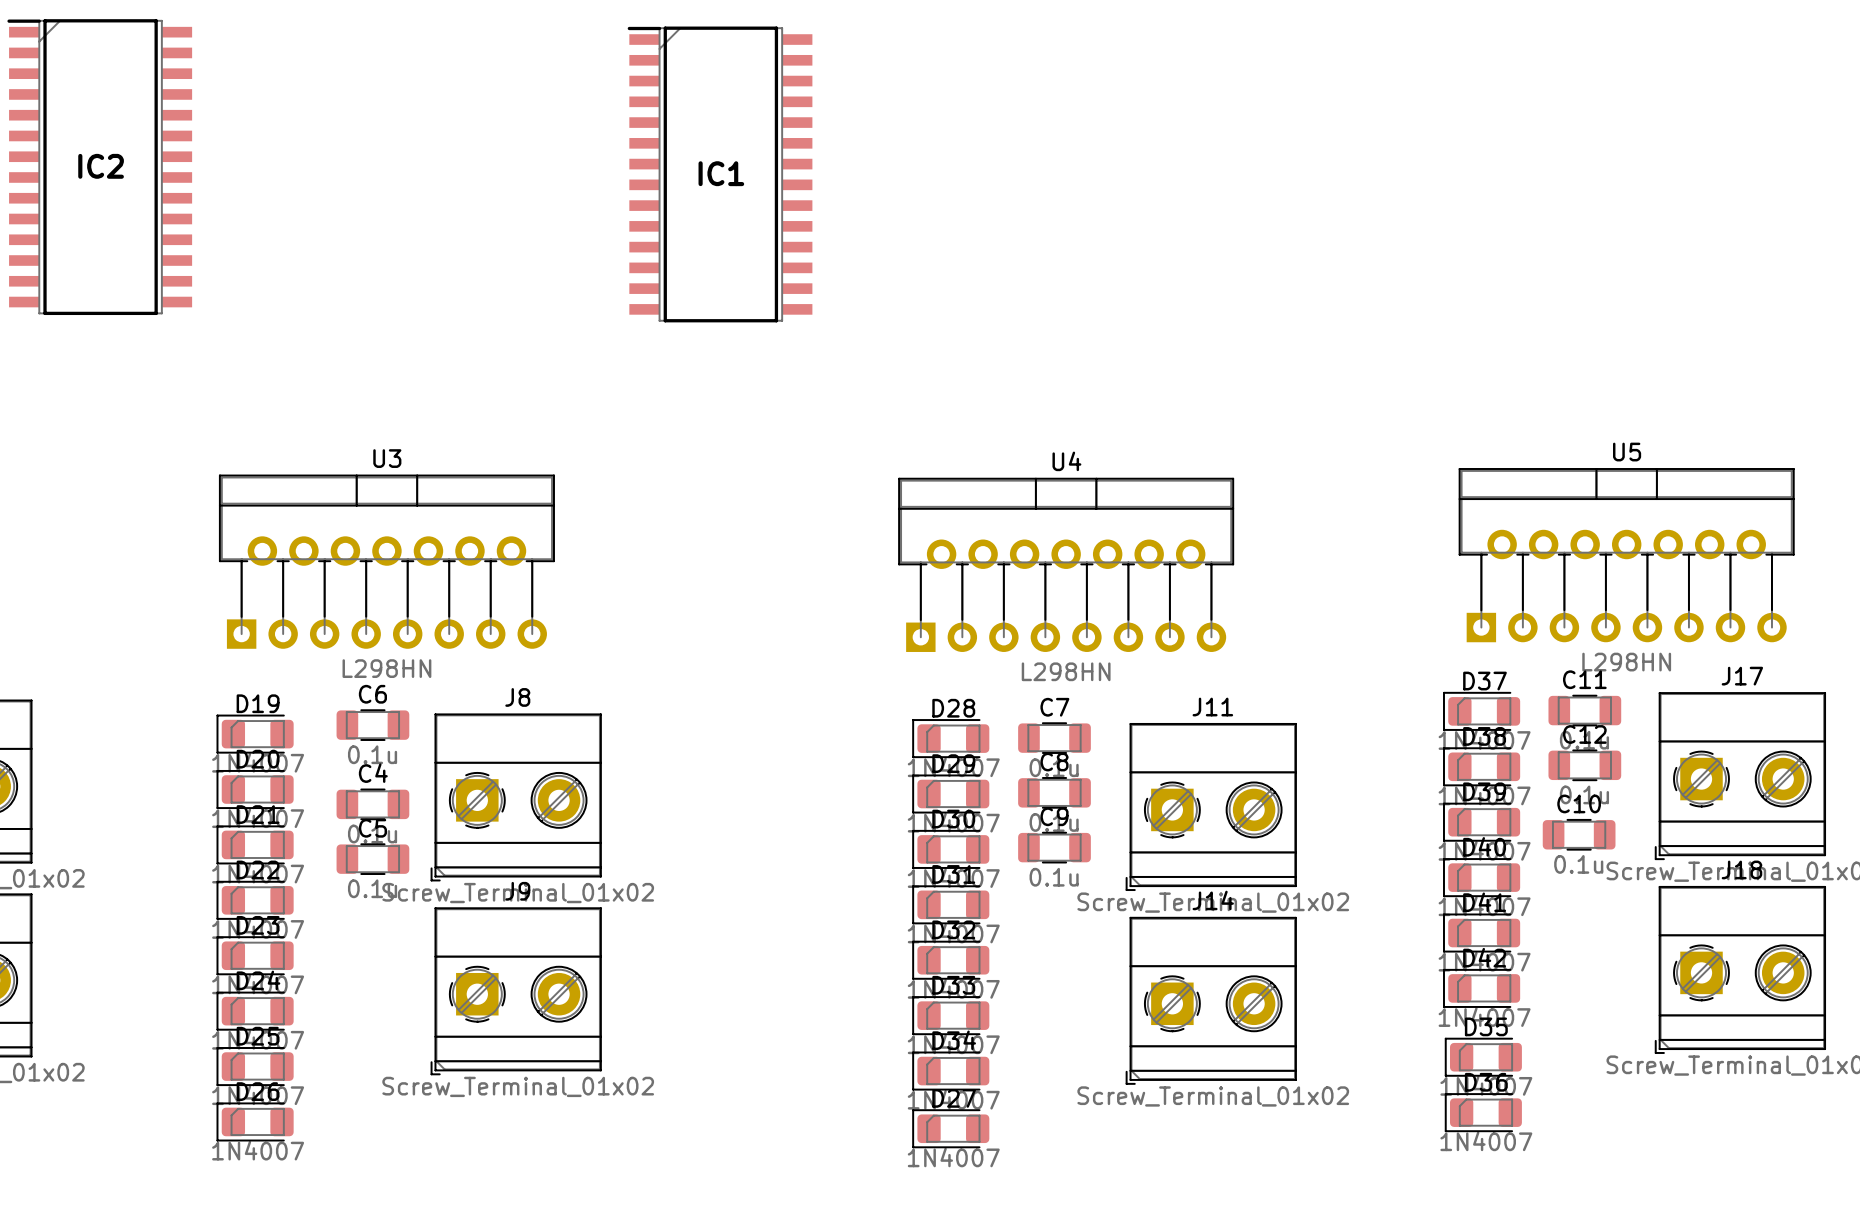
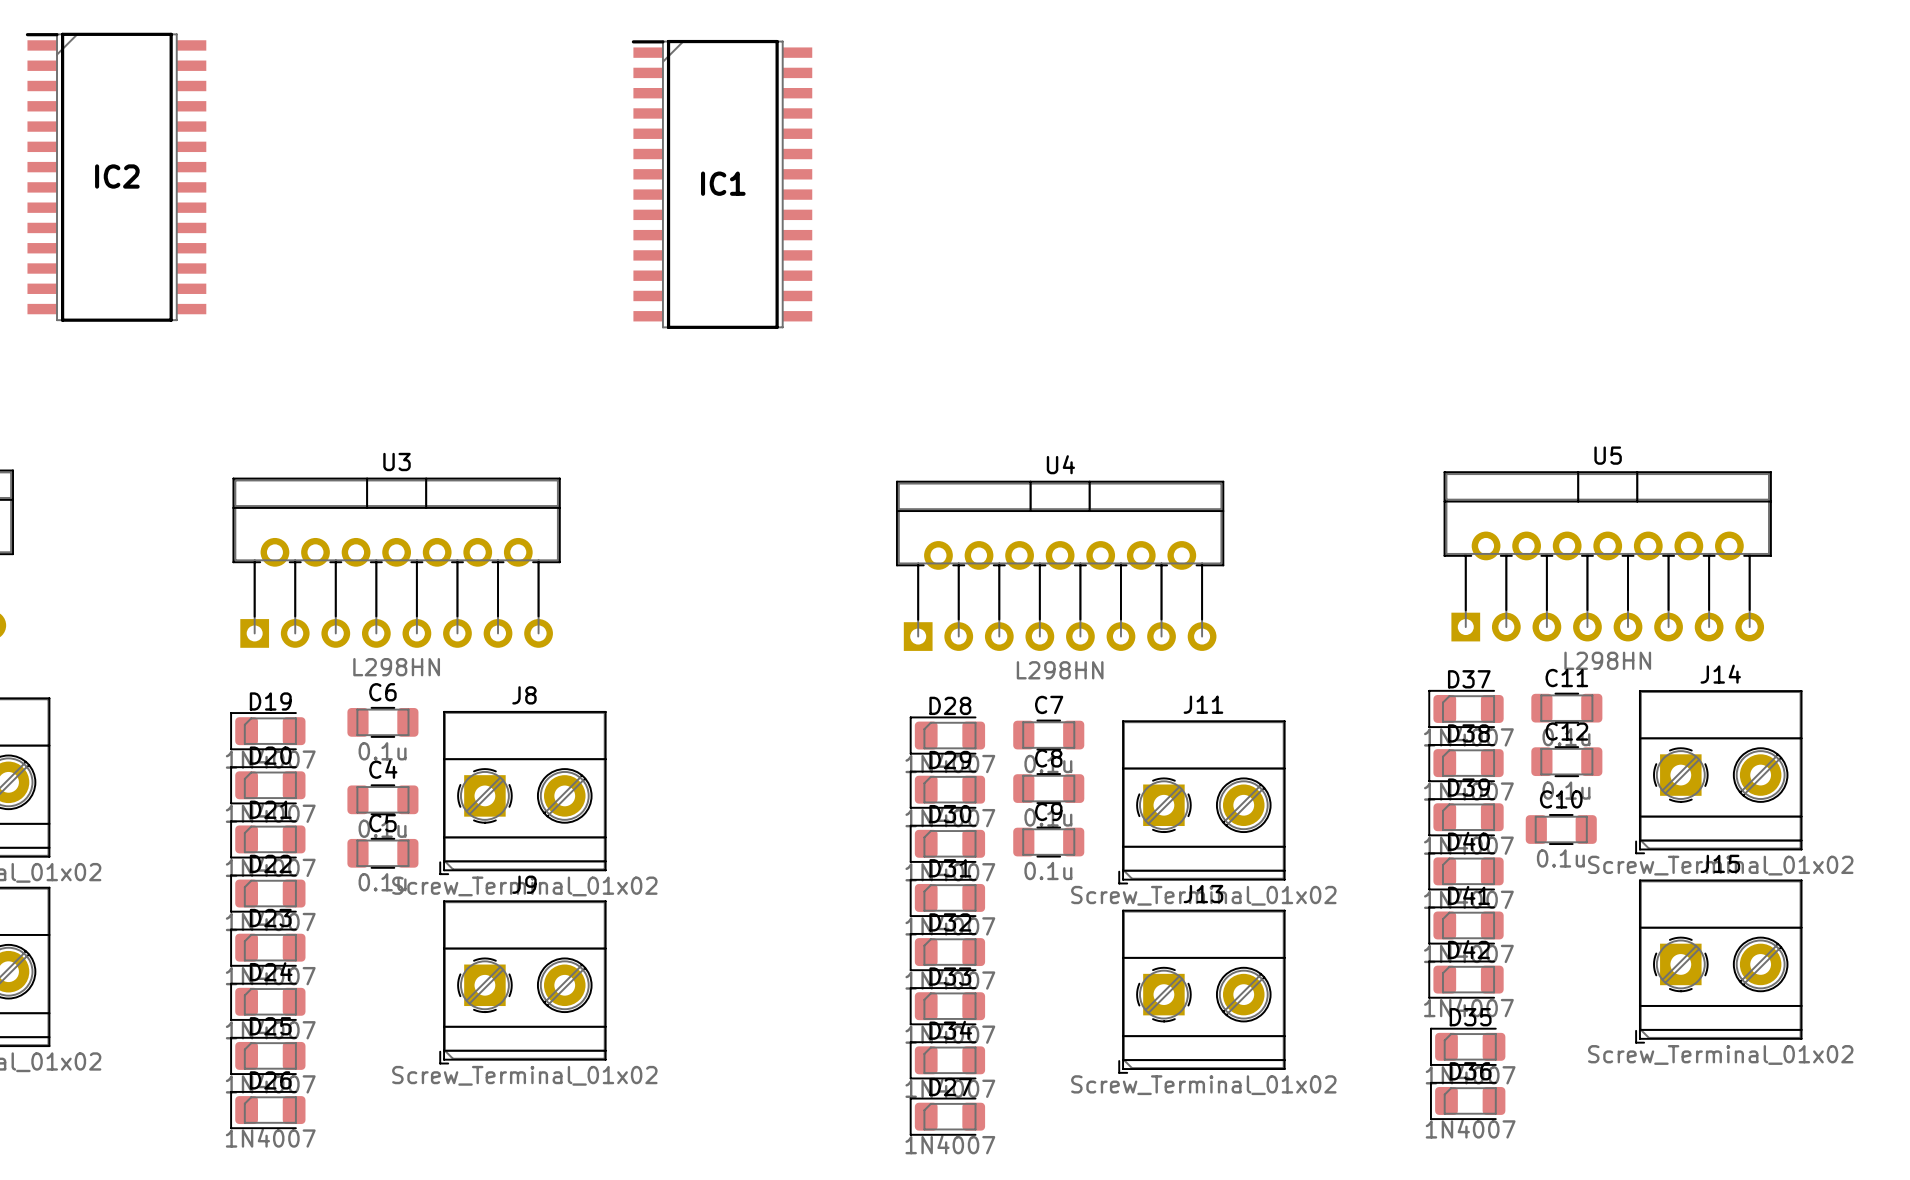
J17 name: J17 (1742, 676) -> J14 (1720, 674)
J18 name: J18 (1741, 869) -> J15 (1720, 863)
J14 name: J14 (1213, 900) -> J13 (1203, 894)

